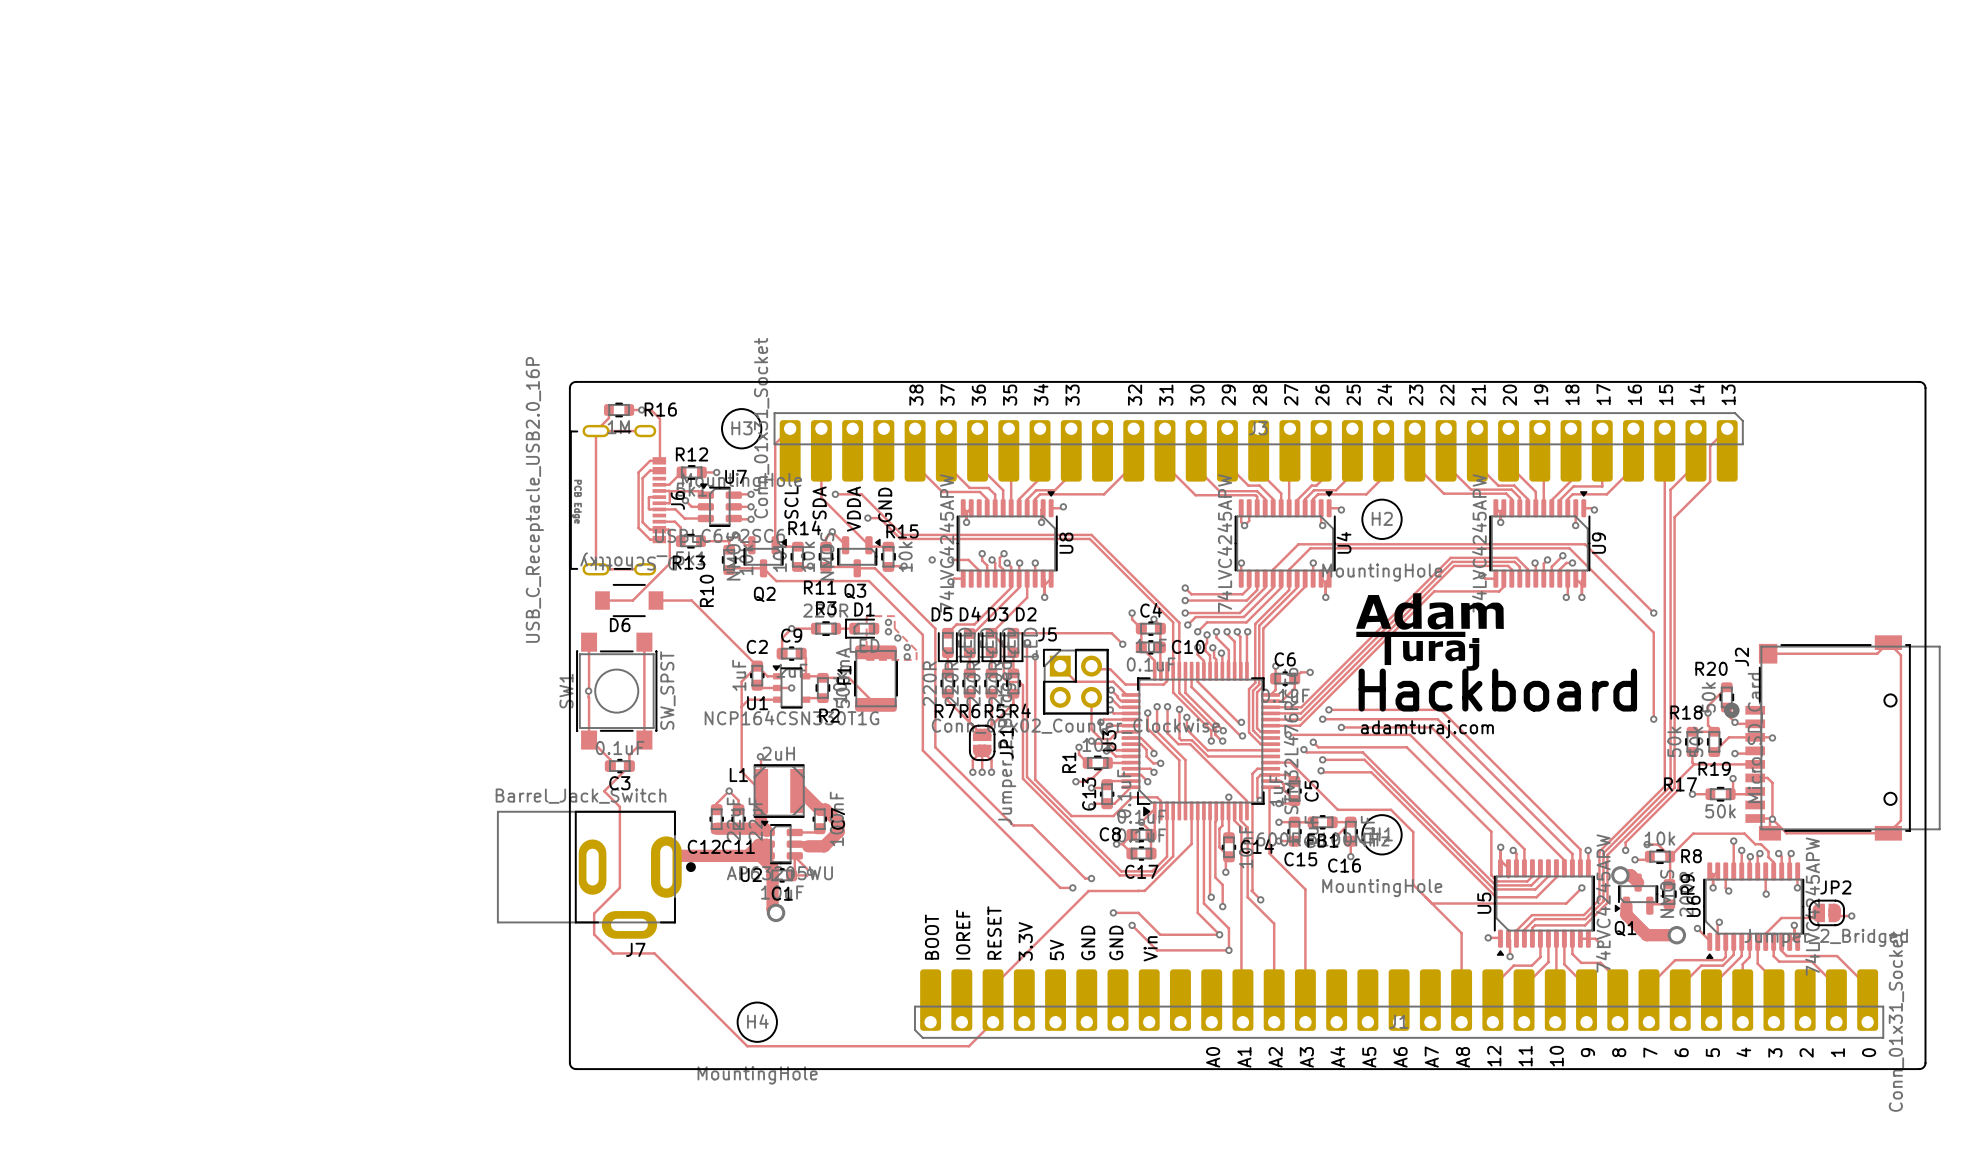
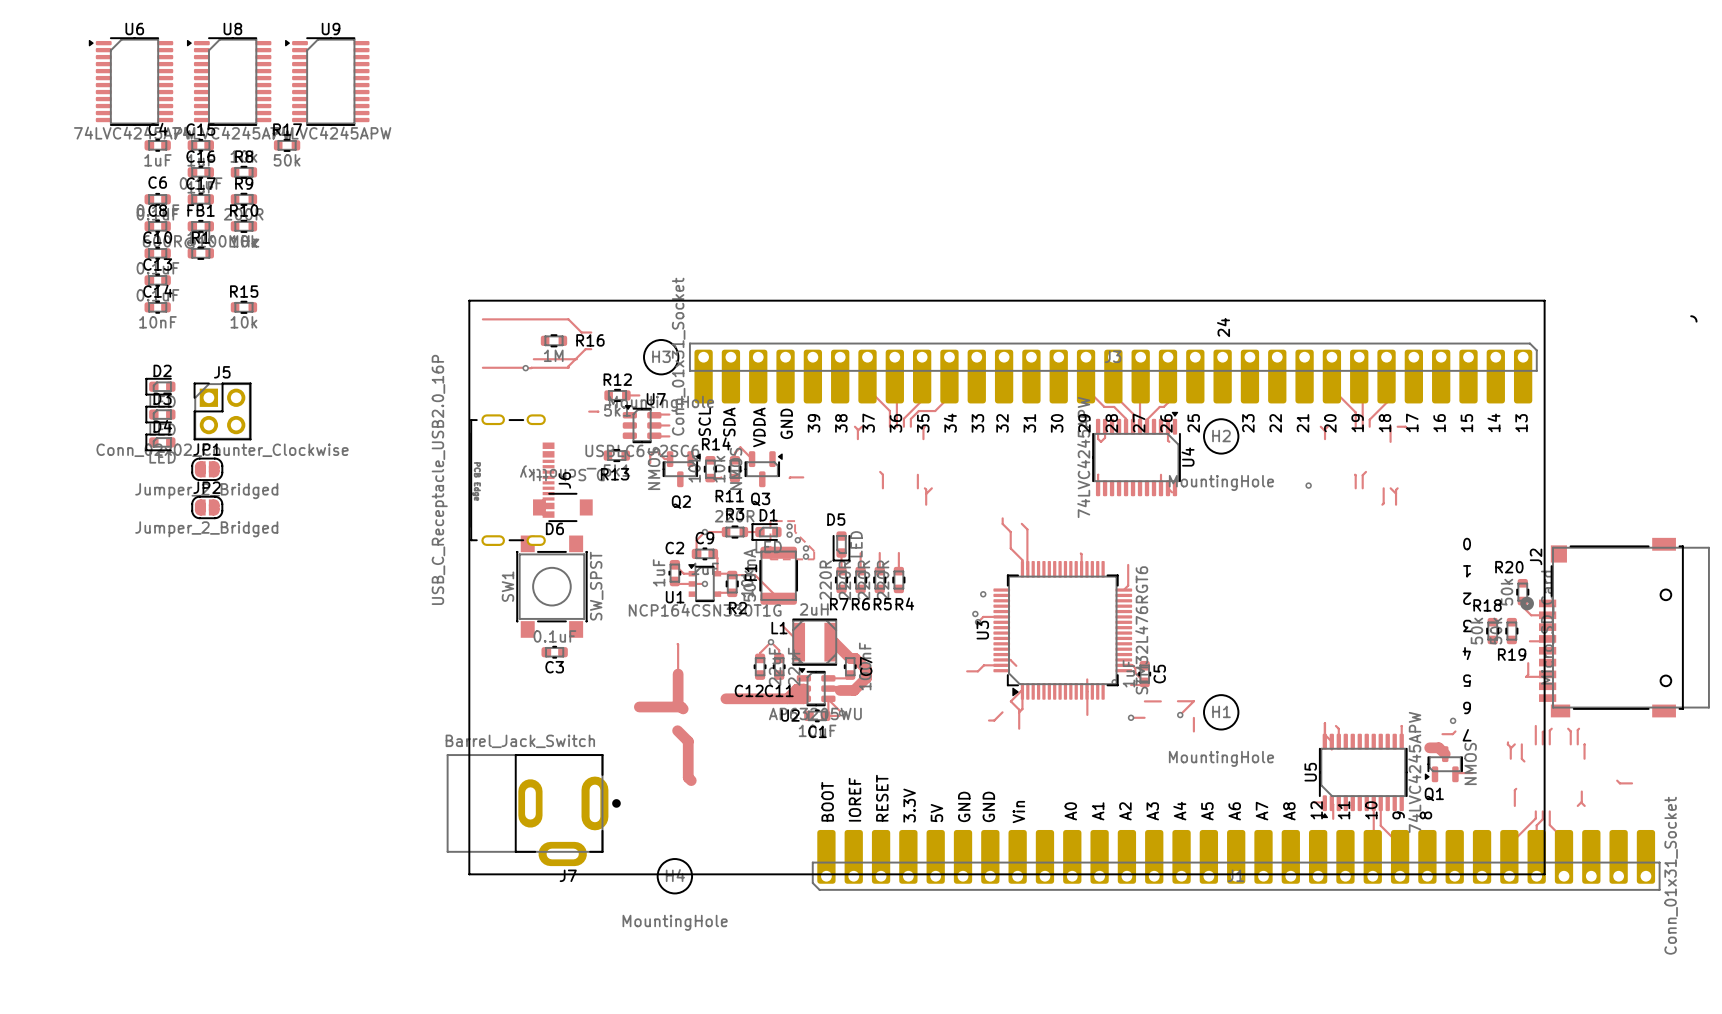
board edge: none -> (469, 300) (1544, 300) (1544, 874) (469, 874) (469, 300)
board edge: (1919, 381) (572, 382) (569, 388) (570, 1066) (576, 1069) (1922, 1068) (1925, 1062) (1925, 388) -> none
track: none -> (482, 319) (568, 319) (581, 332) (591, 332)
text position: 37 (947, 394) -> 37 (868, 423)
text position: 34 (1041, 394) -> 34 (950, 423)
text position: 27 (1291, 394) -> 27 (1139, 423)
text position: 19 (1541, 394) -> 19 (1357, 423)
text position: 18 (1572, 394) -> 18 (1384, 423)
text position: 17 (1603, 394) -> 17 (1412, 422)
text position: 16 (1634, 394) -> 16 (1439, 423)
text position: 15 (1666, 394) -> 15 (1466, 423)
text position: 14 (1696, 394) -> 14 (1493, 422)
text position: 13 (1728, 394) -> 13 (1521, 423)
text position: 38 (916, 395) -> 38 (841, 423)
text position: 36 (978, 395) -> 36 (895, 423)
text position: 35 (1010, 395) -> 35 (923, 423)
text position: 33 (1072, 395) -> 33 (977, 423)
text position: 32 (1135, 395) -> 32 (1002, 423)
text position: 31 (1166, 395) -> 31 (1029, 423)
text position: 30 (1197, 395) -> 30 (1057, 423)
text position: 29 (1228, 395) -> 29 (1084, 423)
text position: 28 (1259, 395) -> 28 (1111, 423)
text position: 26 (1322, 395) -> 26 (1166, 423)
text position: 25 (1353, 395) -> 25 (1193, 423)
text position: 23 (1416, 395) -> 23 (1248, 423)
text position: 22 (1447, 395) -> 22 (1275, 423)
text position: 21 (1478, 395) -> 21 (1302, 423)
text position: 20 (1509, 395) -> 20 (1330, 423)
track: (608, 409) (608, 418) (596, 431) (596, 569) (645, 569) -> none
track: (629, 409) (651, 409) (659, 418) (659, 460) (650, 460) (638, 472) (638, 528) (650, 539) (659, 539) -> none
via: (641, 409) -> none
track: none -> (591, 349) (585, 349) (568, 367) (482, 367)
track: (821, 428) (821, 497) (870, 546) (888, 546) -> none
track: (790, 429) (775, 443) (775, 545) (797, 546) -> none
track: (915, 429) (915, 464) (942, 491) (979, 491) (987, 499) (987, 508) -> none
track: (946, 429) (946, 464) (969, 487) (988, 487) (995, 494) (995, 508) -> none
track: (1133, 429) (1133, 464) (1104, 494) (1040, 494) (1035, 499) (1035, 508) -> none
track: (1164, 429) (1164, 464) (1195, 495) (1255, 495) (1257, 508) -> none
track: (1196, 429) (1196, 467) (1219, 491) (1257, 491) (1265, 499) (1265, 508) -> none
track: (1352, 429) (1352, 473) (1336, 490) (1314, 490) (1305, 499) (1305, 508) -> none
track: (1383, 429) (1383, 477) (1366, 494) (1318, 494) (1313, 499) (1313, 508) -> none
track: (1414, 429) (1414, 464) (1443, 493) (1506, 493) (1511, 499) (1511, 508) -> none
track: (1446, 429) (1446, 464) (1471, 489) (1511, 489) (1519, 497) (1519, 508) -> none
track: (1477, 429) (1477, 464) (1498, 485) (1514, 485) (1527, 499) (1527, 508) -> none
track: (1602, 429) (1602, 486) (1573, 486) (1559, 500) (1559, 508) -> none
track: (1633, 429) (1633, 467) (1606, 494) (1572, 494) (1567, 499) (1567, 508) -> none
track: (1664, 429) (1664, 786) (1599, 851) (1599, 899) (1583, 915) (1531, 915) (1516, 930) (1516, 944) -> none
track: (1695, 429) (1695, 464) (1670, 489) (1670, 786) (1603, 853) (1603, 901) (1585, 919) (1535, 919) (1524, 929) (1524, 944) -> none
track: (1727, 429) (1710, 446) (1710, 481) (1674, 517) (1674, 787) (1607, 854) (1607, 902) (1585, 925) (1535, 925) (1532, 927) (1532, 944) -> none
via: none -> (525, 368)
track: (659, 470) (650, 470) (642, 478) (642, 522) (650, 529) (669, 530) (669, 563) (632, 600) (602, 600) -> none
track: (681, 472) (669, 484) (659, 484) -> none
via: (716, 472) -> none
via: (751, 494) -> none
track: (835, 494) (861, 494) (902, 534) (1091, 534) (1179, 622) (1179, 693) (1215, 729) (1215, 734) (1222, 741) -> none
via: (835, 494) -> none
track: (705, 495) (701, 491) (669, 491) (669, 502) (659, 503) -> none
track: (659, 497) (648, 497) (649, 509) (675, 509) (684, 518) (705, 518) -> none
J6 position: (617, 500) -> (512, 480)
track: (685, 500) (691, 506) (705, 506) -> none
via: (685, 500) -> none
text: none -> 39 (814, 423)
via: (751, 506) -> none
track: (1063, 506) (1051, 508) -> none
via: (1063, 506) -> none
track: (1329, 508) (1341, 509) -> none
via: (1341, 509) -> none
via: (1594, 509) -> none
track: (867, 518) (879, 518) (900, 538) (1089, 538) (1173, 622) (1173, 692) (1211, 730) (1211, 741) -> none
via: (867, 518) -> none
via: (751, 519) -> none
track: (659, 521) (674, 521) (680, 527) (680, 541) -> none
via: (966, 522) -> none
via: (1041, 522) -> none
via: (1500, 522) -> none
via: (1244, 525) -> none
via: (1322, 525) -> none
via: (1575, 525) -> none
via: (832, 531) -> none
U8 rotation: 0° (1007, 539) -> 90° counterclockwise (229, 81)
U8 position: (1007, 539) -> (229, 81)
U9 rotation: 0° (1539, 539) -> 90° counterclockwise (327, 81)
U9 position: (1539, 539) -> (327, 81)
track: (701, 541) (729, 541) -> none
track: (982, 553) (982, 560) (987, 565) (987, 578) -> none
via: (982, 553) -> none
track: (1004, 553) (999, 557) (1003, 578) -> none
via: (1004, 553) -> none
track: (1562, 555) (1551, 566) (1551, 578) -> none
via: (1562, 555) -> none
R15 rotation: 0° (888, 556) -> 90° clockwise (243, 307)
R15 position: (888, 556) -> (243, 307)
R10 rotation: 0° (729, 559) -> 90° clockwise (243, 226)
R10 position: (729, 559) -> (243, 226)
via: (932, 559) -> none
track: (950, 559) (968, 559) (979, 570) (979, 578) -> none
via: (950, 559) -> none
via: (992, 559) -> none
via: (1547, 559) -> none
track: (1572, 562) (1566, 562) (1559, 569) (1559, 578) -> none
via: (1572, 562) -> none
track: (1007, 563) (1011, 567) (1011, 587) (974, 624) (956, 624) (947, 633) -> none
via: (1007, 563) -> none
track: (1019, 563) (1019, 587) (973, 633) (969, 633) -> none
via: (1019, 563) -> none
via: (1035, 563) -> none
via: (1241, 563) -> none
via: (1313, 563) -> none
via: (1535, 563) -> none
via: (810, 566) -> none
track: (826, 566) (875, 568) (935, 628) (935, 747) (1013, 825) (1032, 825) (1085, 878) (1091, 878) -> none
via: (904, 566) -> none
track: (729, 570) (730, 568) (763, 568) (776, 581) (869, 581) (922, 634) (922, 750) (1060, 887) (1072, 887) -> none
track: (1481, 575) (1485, 578) (1495, 578) -> none
track: (963, 578) (954, 578) (950, 581) -> none
track: (1027, 578) (1027, 597) (991, 633) (1003, 645) (1003, 678) (1007, 681) (1019, 681) (1022, 685) (1022, 778) (1119, 875) (1153, 875) (1173, 856) (1173, 810) -> none
track: (1249, 578) (1249, 587) (1242, 594) (1191, 594) (1185, 588) -> none
track: (1257, 578) (1257, 590) (1246, 600) (1185, 600) -> none
track: (1265, 578) (1265, 587) (1239, 613) (1185, 613) -> none
track: (1281, 578) (1281, 587) (1246, 622) (1207, 622) (1197, 631) -> none
track: (1297, 578) (1297, 587) (1259, 625) (1259, 684) (1253, 690) (1253, 730) (1260, 738) (1270, 738) -> none
track: (1305, 578) (1305, 586) (1263, 628) (1263, 686) (1257, 692) (1257, 728) (1260, 731) (1270, 731) -> none
track: (1329, 578) (1325, 582) (1325, 597) -> none
track: (1503, 578) (1503, 586) (1499, 591) (1434, 591) (1299, 725) (1270, 725) -> none
track: (1511, 578) (1511, 569) (1508, 565) (1454, 565) (1300, 719) (1270, 719) -> none
track: (1519, 578) (1519, 566) (1514, 561) (1452, 561) (1300, 713) (1271, 712) -> none
track: (1527, 578) (1527, 569) (1516, 557) (1450, 557) (1301, 707) (1270, 707) -> none
via: (950, 581) -> none
via: (1185, 588) -> none
R10 name position: R10 (706, 590) -> R10 (244, 210)
drawing: [1356, 593, 1504, 671] -> none
via: (1044, 597) -> none
via: (1325, 597) -> none
via: (1566, 597) -> none
via: (1581, 597) -> none
track: (655, 600) (691, 600) (757, 666) (741, 681) (741, 771) (761, 791) -> none
via: (1185, 600) -> none
via: (1132, 613) -> none
via: (1185, 613) -> none
track: (1653, 613) (1585, 544) (1298, 544) (1273, 569) (1273, 587) (1243, 617) (1195, 617) (1187, 624) -> none
via: (1653, 613) -> none
via: (1153, 619) -> none
via: (1187, 624) -> none
C4 position: (1150, 628) -> (157, 145)
via: (1197, 631) -> none
track: (1216, 631) (1216, 637) (1228, 650) (1228, 671) -> none
via: (1216, 631) -> none
track: (1227, 631) (1234, 641) (1234, 671) -> none
via: (1227, 631) -> none
track: (1237, 631) (1240, 636) (1240, 671) -> none
via: (1237, 631) -> none
track: (1247, 631) (1246, 671) -> none
via: (1247, 631) -> none
track: (1013, 633) (1111, 633) (1122, 644) -> none
J5 name position: J5 (1047, 634) -> J5 (222, 372)
track: (1207, 634) (1205, 650) (1210, 655) (1210, 671) -> none
via: (1207, 634) -> none
track: (589, 642) (589, 740) (610, 759) (610, 766) -> none
track: (644, 642) (644, 740) (629, 755) (629, 766) (604, 791) (619, 806) (619, 887) (594, 913) (594, 934) (613, 953) (654, 953) (747, 1046) (969, 1046) (993, 1022) (993, 986) (1088, 891) (1138, 891) -> none
track: (1027, 642) (1026, 777) (1121, 871) (1152, 871) (1167, 856) (1167, 810) -> none
via: (1027, 642) -> none
text: none -> 0 (1467, 544)
D3 rotation: 0° (991, 644) -> 90° clockwise (160, 414)
D3 position: (991, 644) -> (160, 414)
D2 rotation: 0° (1013, 644) -> 90° clockwise (160, 386)
D2 position: (1013, 644) -> (160, 386)
via: (1122, 644) -> none
D4 rotation: 0° (969, 645) -> 90° clockwise (160, 442)
D4 position: (969, 645) -> (160, 442)
C10 name position: C10 (1188, 646) -> C10 (157, 237)
C10 position: (1150, 647) -> (157, 253)
track: (1197, 647) (1197, 654) (1203, 660) (1203, 671) -> none
via: (1197, 647) -> none
track: (1212, 647) (1216, 659) (1216, 671) -> none
via: (1212, 647) -> none
via: (1221, 653) -> none
track: (1768, 653) (1877, 653) (1888, 642) (1900, 655) (1900, 820) (1888, 833) (1786, 833) (1771, 818) (1755, 818) -> none
track: (1035, 656) (1035, 779) (1071, 816) (1113, 816) (1132, 797) (1157, 797) (1160, 800) (1160, 810) -> none
via: (1035, 656) -> none
track: (1060, 666) (1075, 681) (1113, 681) (1126, 694) (1131, 694) -> none
track: (1091, 666) (1094, 669) (1110, 669) (1125, 684) (1163, 684) (1167, 681) (1167, 671) -> none
via: (1275, 666) -> none
track: (1185, 671) (1185, 692) (1223, 730) -> none
track: (1191, 671) (1191, 687) (1242, 735) -> none
track: (1197, 671) (1197, 681) (1238, 722) (1241, 722) -> none
track: (1310, 672) (1300, 672) (1294, 678) (1294, 688) (1281, 701) (1270, 701) -> none
via: (1310, 672) -> none
text: none -> 1 (1467, 571)
C6 position: (1285, 678) -> (157, 199)
J5 position: (1075, 681) -> (222, 411)
track: (1726, 687) (1708, 705) (1708, 725) (1714, 731) (1692, 731) -> none
track: (1111, 690) (1121, 701) (1131, 701) -> none
via: (1111, 690) -> none
text: Hackboard (1497, 690) -> none
via: (588, 691) -> none
track: (947, 693) (947, 700) (982, 734) (1013, 703) (1013, 693) -> none
track: (969, 693) (969, 722) -> none
track: (991, 693) (991, 725) -> none
track: (1091, 697) (1091, 729) (1100, 739) (1110, 739) (1117, 731) (1131, 731) -> none
track: (777, 699) (748, 699) (741, 706) -> none
track: (1109, 699) (1112, 699) (1119, 707) (1131, 707) -> none
text: none -> 2 (1467, 598)
track: (1157, 706) (1157, 731) (1185, 760) (1185, 810) -> none
via: (1157, 706) -> none
track: (1167, 706) (1167, 733) (1178, 744) (1190, 744) (1246, 800) (1246, 810) -> none
via: (1167, 706) -> none
track: (1110, 709) (1113, 713) (1131, 713) -> none
via: (1110, 709) -> none
track: (1179, 709) (1179, 738) (1191, 740) (1208, 756) (1270, 756) -> none
via: (1179, 709) -> none
track: (1328, 709) (1440, 709) (1580, 849) (1580, 868) -> none
via: (1328, 709) -> none
track: (1147, 712) (1147, 728) (1179, 760) (1179, 810) -> none
via: (1147, 712) -> none
via: (1708, 713) -> none
track: (1186, 717) (1186, 729) (1207, 750) (1270, 750) -> none
via: (1186, 717) -> none
track: (1131, 719) (1103, 719) (1100, 722) -> none
track: (1322, 719) (1437, 719) (1572, 853) (1572, 868) -> none
via: (1322, 719) -> none
track: (1653, 719) (1653, 632) (1569, 548) (1310, 548) (1289, 569) (1289, 590) (1255, 623) (1255, 682) (1249, 689) (1249, 732) (1260, 744) (1270, 744) -> none
via: (1653, 719) -> none
via: (1241, 722) -> none
via: (1734, 722) -> none
track: (1341, 727) (1431, 727) (1564, 860) (1564, 868) -> none
via: (1341, 727) -> none
text: adamturaj.com (1427, 729) -> none
via: (1223, 730) -> none
track: (1288, 734) (1410, 734) (1524, 849) (1524, 868) -> none
via: (1288, 734) -> none
track: none -> (781, 625) (798, 642)
via: (1242, 735) -> none
text: none -> 3 (1467, 626)
track: (1772, 737) (1729, 737) (1714, 752) -> none
via: (1772, 737) -> none
track: (1131, 738) (1140, 738) (1153, 751) (1153, 753) -> none
track: (1091, 741) (1094, 743) (1109, 743) (1116, 750) (1131, 750) -> none
via: (1091, 741) -> none
via: (1211, 741) -> none
via: (1222, 741) -> none
JP1 rotation: 0° (982, 742) -> 90° clockwise (207, 469)
JP1 position: (982, 742) -> (207, 469)
track: (1313, 742) (1318, 747) (1406, 747) (1491, 831) (1491, 875) (1497, 881) (1527, 881) (1532, 876) (1532, 868) -> none
via: (1313, 742) -> none
JP1 name position: JP1 (1006, 743) -> JP1 (207, 449)
track: (1131, 744) (1140, 744) (1146, 749) (1146, 756) (1153, 763) (1160, 763) -> none
track: (1079, 747) (1079, 754) (1087, 762) -> none
via: (1079, 747) -> none
track: (1303, 749) (1306, 752) (1362, 752) (1495, 885) (1531, 885) (1540, 876) (1540, 868) -> none
via: (1303, 749) -> none
track: (982, 750) (982, 772) -> none
track: (982, 750) (972, 760) (972, 772) -> none
track: (982, 750) (991, 760) (991, 772) -> none
track: (1106, 750) (1110, 750) (1116, 756) (1131, 756) -> none
via: (1106, 750) -> none
track: (1692, 752) (1694, 764) -> none
via: (1153, 753) -> none
via: (1734, 753) -> none
via: none -> (771, 642)
via: (760, 756) -> none
track: (1322, 759) (1364, 759) (1494, 889) (1535, 889) (1548, 876) (1548, 868) -> none
via: (1322, 759) -> none
R1 name rotation: 0° (1069, 762) -> 90° clockwise (201, 237)
R1 name position: R1 (1069, 762) -> R1 (201, 237)
R1 position: (1097, 762) -> (200, 253)
track: (1131, 762) (1107, 762) (1092, 778) (1088, 778) (1085, 781) (1075, 781) -> none
track: (1270, 762) (1290, 762) (1337, 809) (1391, 809) (1413, 832) (1413, 884) (1461, 933) (1461, 1022) -> none
via: (1160, 763) -> none
track: (1694, 764) (1755, 764) -> none
track: (1694, 764) (1678, 779) (1678, 789) (1625, 842) (1625, 850) -> none
text: none -> 4 (1466, 653)
track: (1131, 768) (1150, 768) (1153, 772) -> none
track: (1270, 768) (1257, 768) (1252, 773) (1251, 890) (1260, 899) -> none
track: (1321, 770) (1322, 772) (1371, 772) (1496, 897) (1536, 897) (1556, 877) (1556, 868) -> none
via: (1321, 770) -> none
via: (972, 772) -> none
via: (982, 772) -> none
via: (991, 772) -> none
via: (1153, 772) -> none
track: (1755, 777) (1767, 777) (1772, 782) (1772, 819) (1769, 821) (1769, 833) -> none
via: (1733, 778) -> none
via: (1075, 781) -> none
via: (1147, 781) -> none
track: (1294, 781) (1287, 774) (1260, 774) (1257, 778) (1257, 797) (1260, 800) -> none
R17 name position: R17 (1680, 784) -> R17 (287, 129)
via: (1091, 787) -> none
track: (1131, 787) (1114, 803) (1094, 803) (1091, 806) -> none
track: (1270, 787) (1269, 853) (1305, 889) (1305, 1022) -> none
via: (729, 791) -> none
L1 position: (779, 791) -> (814, 642)
track: (797, 791) (801, 791) (819, 809) (825, 809) (838, 822) (838, 831) (824, 846) (794, 844) -> (830, 642) (833, 642) (850, 658) (855, 658) (866, 669) (866, 677) (854, 690) (828, 688)
C13 rotation: 0° (1107, 794) -> 90° clockwise (157, 280)
C13 position: (1107, 794) -> (157, 280)
track: (1692, 794) (1710, 794) -> none
via: (1692, 794) -> none
R17 position: (1720, 794) -> (287, 145)
via: (1228, 797) -> none
via: (1278, 803) -> none
via: (1091, 806) -> none
track: (716, 809) (716, 803) (729, 791) (738, 800) (738, 809) -> (760, 658) (760, 653) (771, 642) (779, 650) (779, 658)
track: (1191, 810) (1191, 844) (1144, 890) (1138, 890) -> none
track: (1197, 810) (1197, 912) (1219, 934) (1160, 934) (1138, 912) (1113, 912) -> none
track: (1203, 810) (1203, 903) (1228, 928) (1228, 950) (1157, 950) (1132, 925) -> none
track: (1210, 810) (1211, 897) -> none
track: (1216, 810) (1215, 877) (1222, 884) (1222, 906) -> none
track: (1222, 810) (1219, 847) (1228, 856) (1225, 859) (1225, 872) -> none
track: (1234, 810) (1234, 820) (1241, 827) (1242, 1022) -> none
track: (1240, 810) (1240, 820) (1247, 827) (1247, 897) (1274, 923) (1274, 1022) -> none
C12 position: (716, 819) -> (760, 666)
C11 position: (738, 819) -> (779, 666)
track: none -> (725, 698) (803, 698) (803, 689) (797, 689) (787, 698)
C7 position: (819, 819) -> (850, 666)
via: (1772, 819) -> none
via: (1141, 822) -> none
via: (1278, 822) -> none
track: (1279, 822) (1294, 822) -> none
FB1 position: (1322, 822) -> (200, 226)
track: (819, 828) (815, 832) (794, 832) -> (850, 675) (846, 678) (828, 678)
C15 rotation: 0° (1294, 831) -> 90° clockwise (200, 145)
C15 position: (1294, 831) -> (200, 145)
C16 rotation: 0° (1350, 831) -> 90° clockwise (200, 172)
C16 position: (1350, 831) -> (200, 172)
C8 name position: C8 (1110, 834) -> C8 (157, 210)
C8 position: (1141, 834) -> (157, 226)
via: none -> (842, 713)
FB1 name position: FB1 (1322, 840) -> FB1 (201, 210)
track: (1733, 841) (1733, 871) -> none
via: (1733, 841) -> none
U2 position: (780, 842) -> (816, 687)
via: (1116, 844) -> none
track: (1122, 844) (1131, 853) -> none
track: (1647, 844) (1658, 844) (1670, 856) -> none
C14 name position: C14 (1257, 846) -> C14 (157, 291)
C14 rotation: 0° (1228, 847) -> 90° clockwise (157, 307)
C14 position: (1228, 847) -> (157, 307)
via: (1500, 847) -> none
via: (1513, 850) -> none
via: (1588, 850) -> none
via: (1625, 850) -> none
via: (1741, 850) -> none
C17 position: (1141, 853) -> (200, 199)
via: (1759, 853) -> none
via: (1778, 853) -> none
via: (1791, 853) -> none
track: (747, 855) (758, 844) (766, 844) (766, 855) (677, 855) (666, 867) (660, 867) -> none
track: (794, 855) (794, 872) (791, 875) (807, 875) (810, 872) (794, 856) -> (828, 698) (828, 713) (825, 715) (839, 715) (842, 713) (828, 699)
via: (1350, 856) -> none
R8 position: (1660, 856) -> (243, 172)
track: (1670, 856) (1693, 833) (1744, 833) (1755, 844) (1761, 844) (1768, 851) (1768, 857) (1773, 862) (1773, 871) -> none
track: (1670, 856) (1669, 883) -> none
R8 name position: R8 (1691, 856) -> R8 (244, 156)
via: (1750, 856) -> none
C15 name position: C15 (1300, 859) -> C15 (200, 129)
via: (1635, 859) -> none
C16 name position: C16 (1344, 865) -> C16 (200, 156)
C17 name position: C17 (1141, 871) -> C17 (201, 183)
track: (1765, 871) (1766, 894) -> none
via: (810, 872) -> none
via: (1225, 872) -> none
J7 position: (596, 874) -> (533, 810)
C1 position: (782, 875) -> (817, 715)
via: (1620, 875) -> none
via: (1091, 878) -> none
via: (1072, 887) -> none
track: (1581, 887) (1566, 903) (1431, 903) -> none
via: (1581, 887) -> none
via: (1713, 887) -> none
via: (1797, 887) -> none
JP2 name position: JP2 (1835, 887) -> JP2 (207, 487)
via: (1728, 891) -> none
R9 rotation: 0° (1669, 894) -> 90° clockwise (243, 199)
R9 position: (1669, 894) -> (243, 199)
via: (1766, 894) -> none
via: (1211, 897) -> none
via: (1260, 899) -> none
track: (1626, 905) (1626, 914) (1646, 935) (1676, 935) -> none
via: (1222, 906) -> none
U6 rotation: 0° (1753, 910) -> 90° clockwise (131, 81)
U6 position: (1753, 910) -> (131, 81)
via: (776, 912) -> none
via: (1113, 912) -> none
track: (1818, 912) (1813, 918) (1781, 918) (1765, 933) (1765, 941) -> none
JP2 position: (1826, 912) -> (207, 507)
via: (1851, 916) -> none
via: (1719, 922) -> none
via: (1132, 925) -> none
via: (1794, 925) -> none
track: (1697, 928) (1709, 941) -> none
via: (1697, 928) -> none
via: (1219, 934) -> none
via: (1676, 935) -> none
via: (1488, 937) -> none
track: (1580, 938) (1595, 938) (1600, 944) -> none
track: (1781, 939) (1781, 950) (1786, 956) (1837, 956) (1867, 986) (1867, 1022) -> none
track: (1733, 941) (1733, 954) (1722, 965) (1701, 965) (1680, 986) (1680, 1022) -> none
track: (1540, 944) (1540, 957) (1531, 965) (1513, 965) (1492, 986) (1492, 1022) -> none
track: (1548, 944) (1548, 962) (1524, 986) (1524, 1022) -> none
track: (1572, 944) (1572, 954) (1581, 962) (1600, 962) (1617, 979) (1617, 1022) -> none
via: (1600, 944) -> none
track: (1725, 948) (1725, 957) (1722, 960) (1675, 960) (1649, 986) (1649, 1022) -> none
track: (1773, 948) (1773, 956) (1779, 961) (1811, 961) (1836, 986) (1836, 1022) -> none
via: (1228, 950) -> none
via: (1510, 956) -> none
text position: 9 (1587, 1052) -> 9 (1398, 815)
text position: 8 (1619, 1052) -> 8 (1425, 815)
text rotation: 0° (1650, 1052) -> 90° counterclockwise (1467, 735)
text position: 7 (1650, 1052) -> 7 (1467, 735)
text rotation: 0° (1681, 1052) -> 90° counterclockwise (1467, 707)
text position: 6 (1681, 1052) -> 6 (1467, 707)
text rotation: 0° (1712, 1052) -> 90° counterclockwise (1467, 680)
text position: 5 (1712, 1052) -> 5 (1467, 680)
text: 4 (1743, 1052) -> none
text: 3 (1775, 1052) -> none
text: 2 (1806, 1052) -> none
text: 1 (1837, 1052) -> none
text: 0 (1869, 1052) -> none
text position: 12 (1494, 1056) -> 12 (1316, 810)
text position: 11 (1525, 1056) -> 11 (1343, 810)
text position: 10 (1556, 1056) -> 10 (1371, 810)
text position: A0 (1213, 1057) -> A0 (1070, 811)
text position: A1 (1244, 1057) -> A1 (1098, 811)
text position: A2 (1275, 1057) -> A2 (1125, 811)
text position: A3 (1306, 1057) -> A3 (1152, 811)
text position: A4 (1337, 1057) -> A4 (1179, 811)
text position: A5 (1369, 1057) -> A5 (1207, 811)
text position: A6 (1400, 1057) -> A6 (1234, 811)
text position: A7 (1431, 1057) -> A7 (1262, 811)
text position: A8 (1463, 1057) -> A8 (1289, 811)

